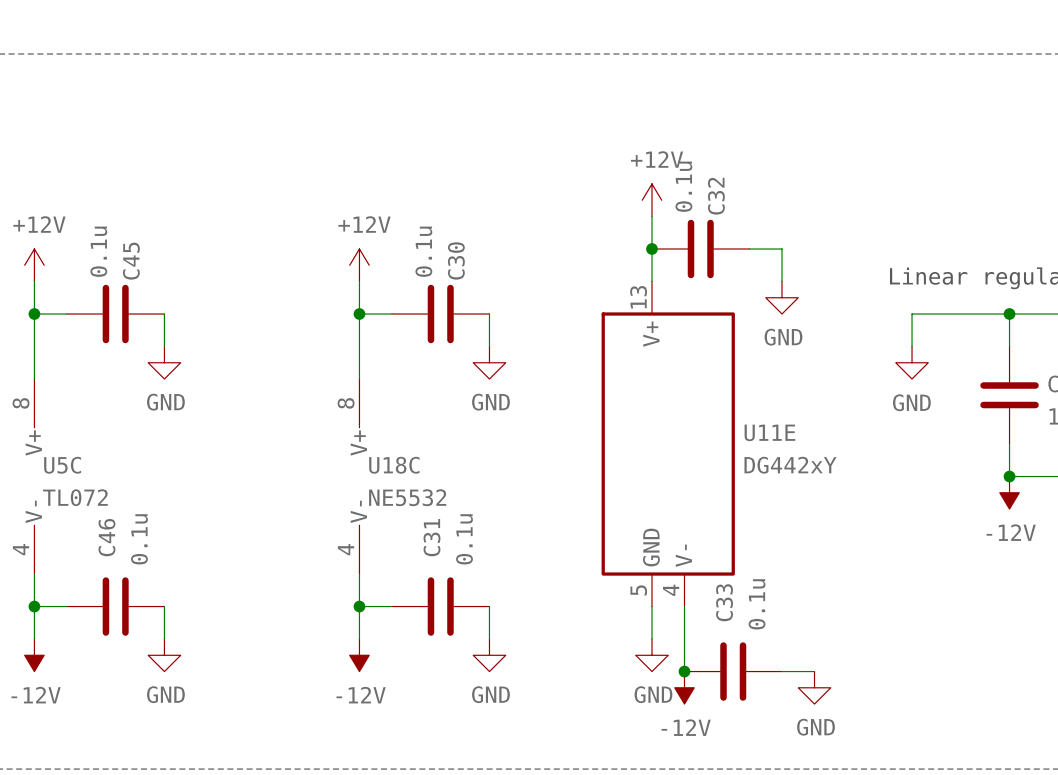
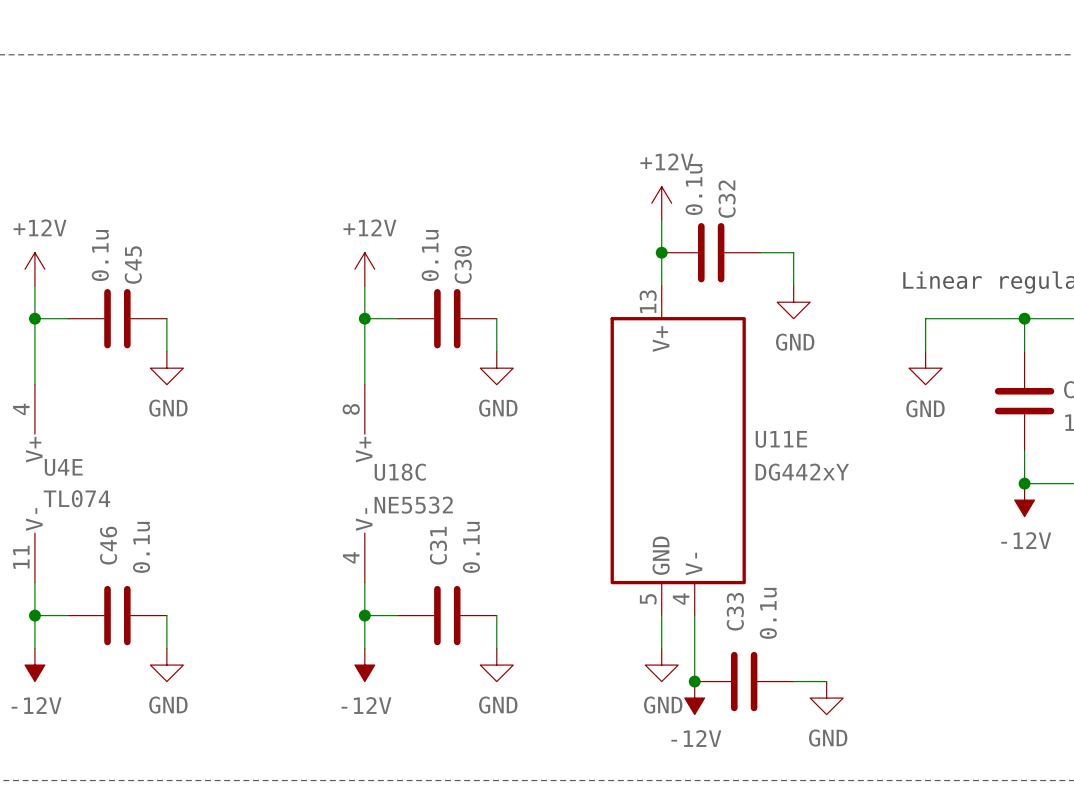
U5C pin number: 8 (21, 403) -> 4 (21, 409)
U5C name: U5C (62, 465) -> U4E (63, 467)
U5C value: TL072 (75, 497) -> TL074 (76, 498)
U5C pin number: 4 (21, 549) -> 11 (21, 557)

